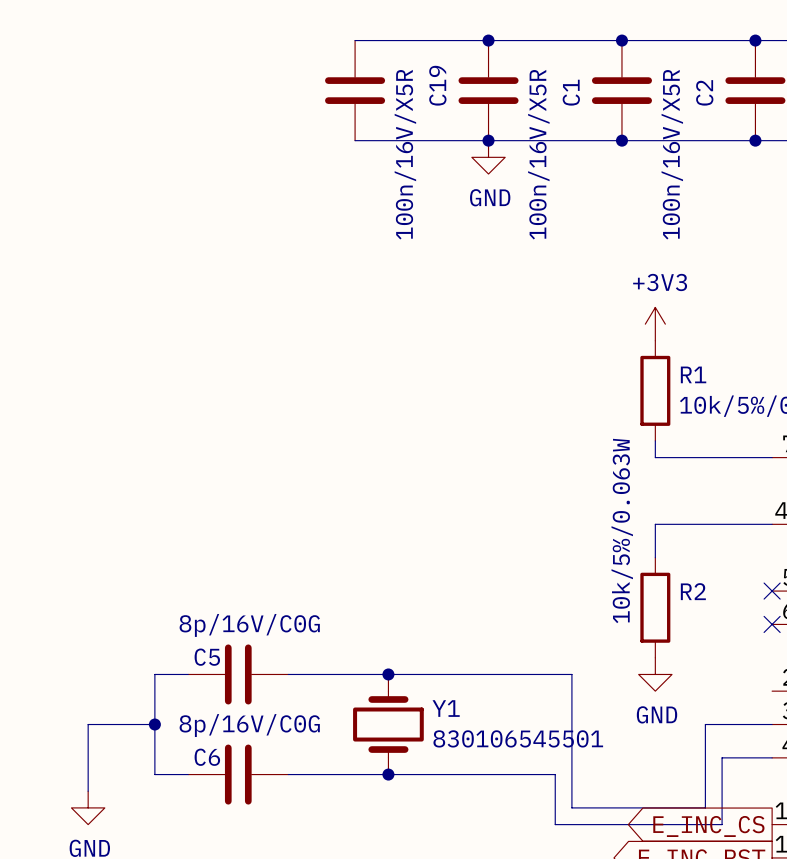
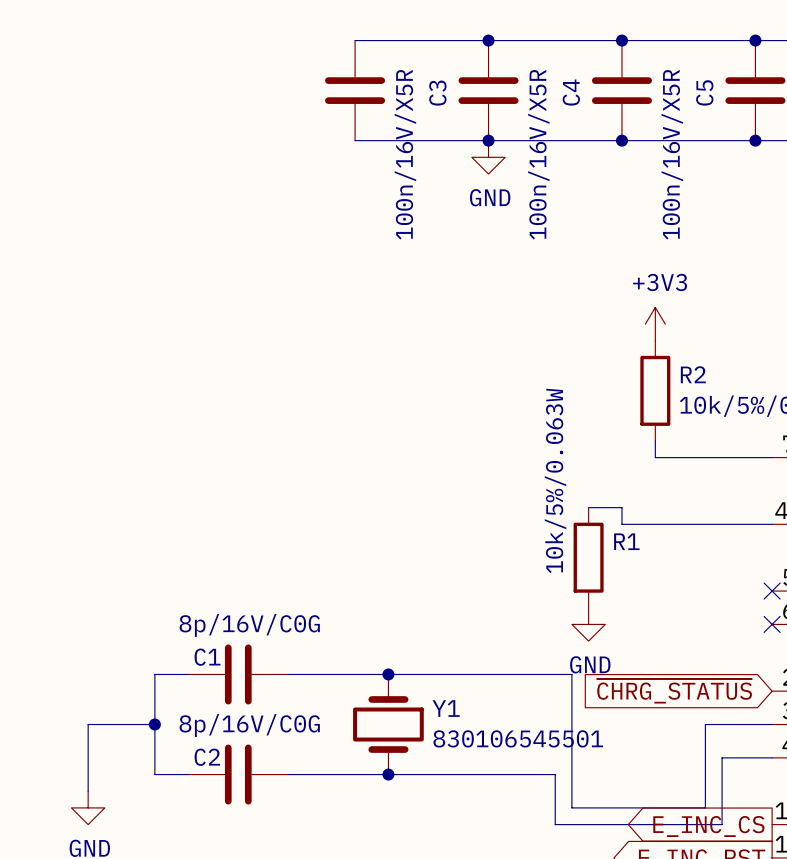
C19 name: C19 (437, 85) -> C3 (437, 93)
C1 name: C1 (571, 92) -> C4 (571, 92)
C2 name: C2 (704, 92) -> C5 (704, 92)
R1 name: R1 (693, 374) -> R2 (693, 374)
wire: (655, 524) (655, 557) -> (655, 524) (621, 524) (621, 507) (588, 507)
R1: none -> 10k/5%/0.063W (588, 557)
R2: 10k/5%/0.063W (655, 607) -> none
C5 name: C5 (207, 657) -> C1 (207, 657)
power symbol position: GND (655, 674) -> GND (588, 624)
global label: none -> ~{CHRG_STATUS} (674, 691)
C6 name: C6 (207, 757) -> C2 (207, 757)

